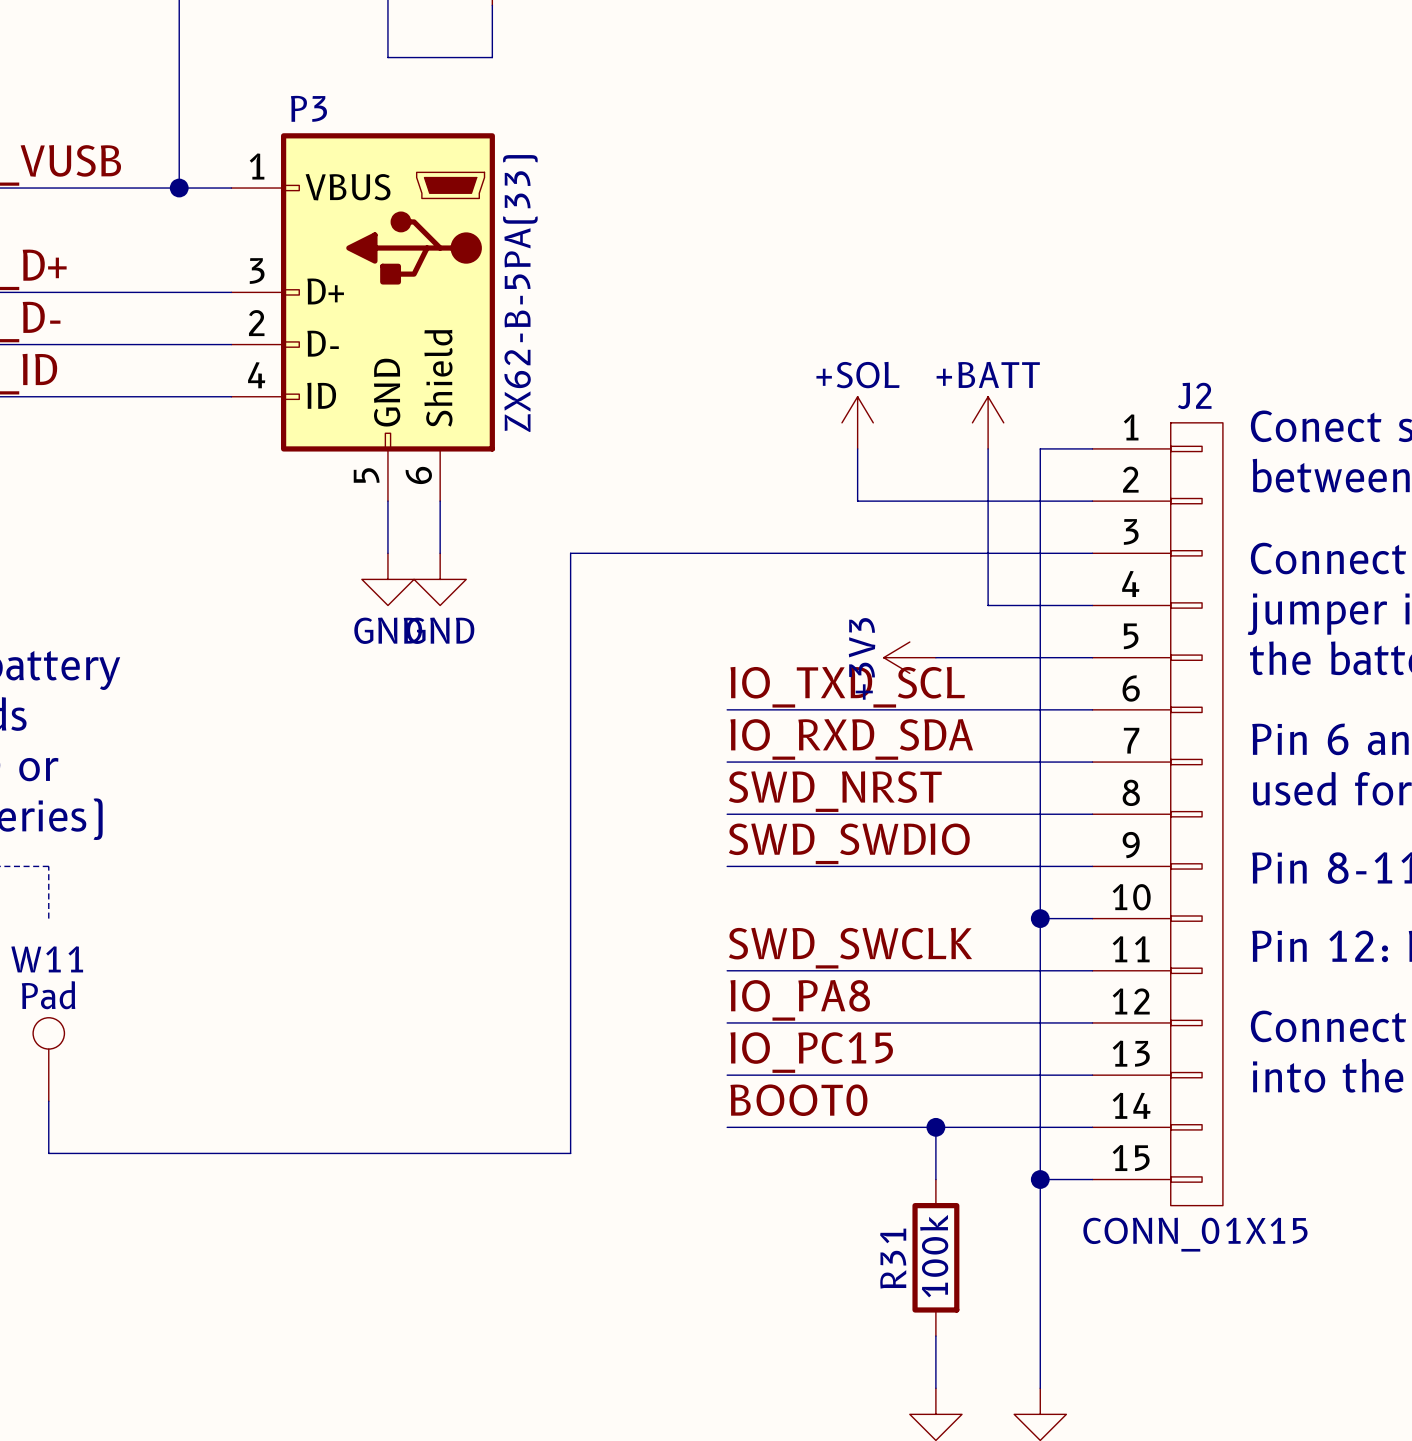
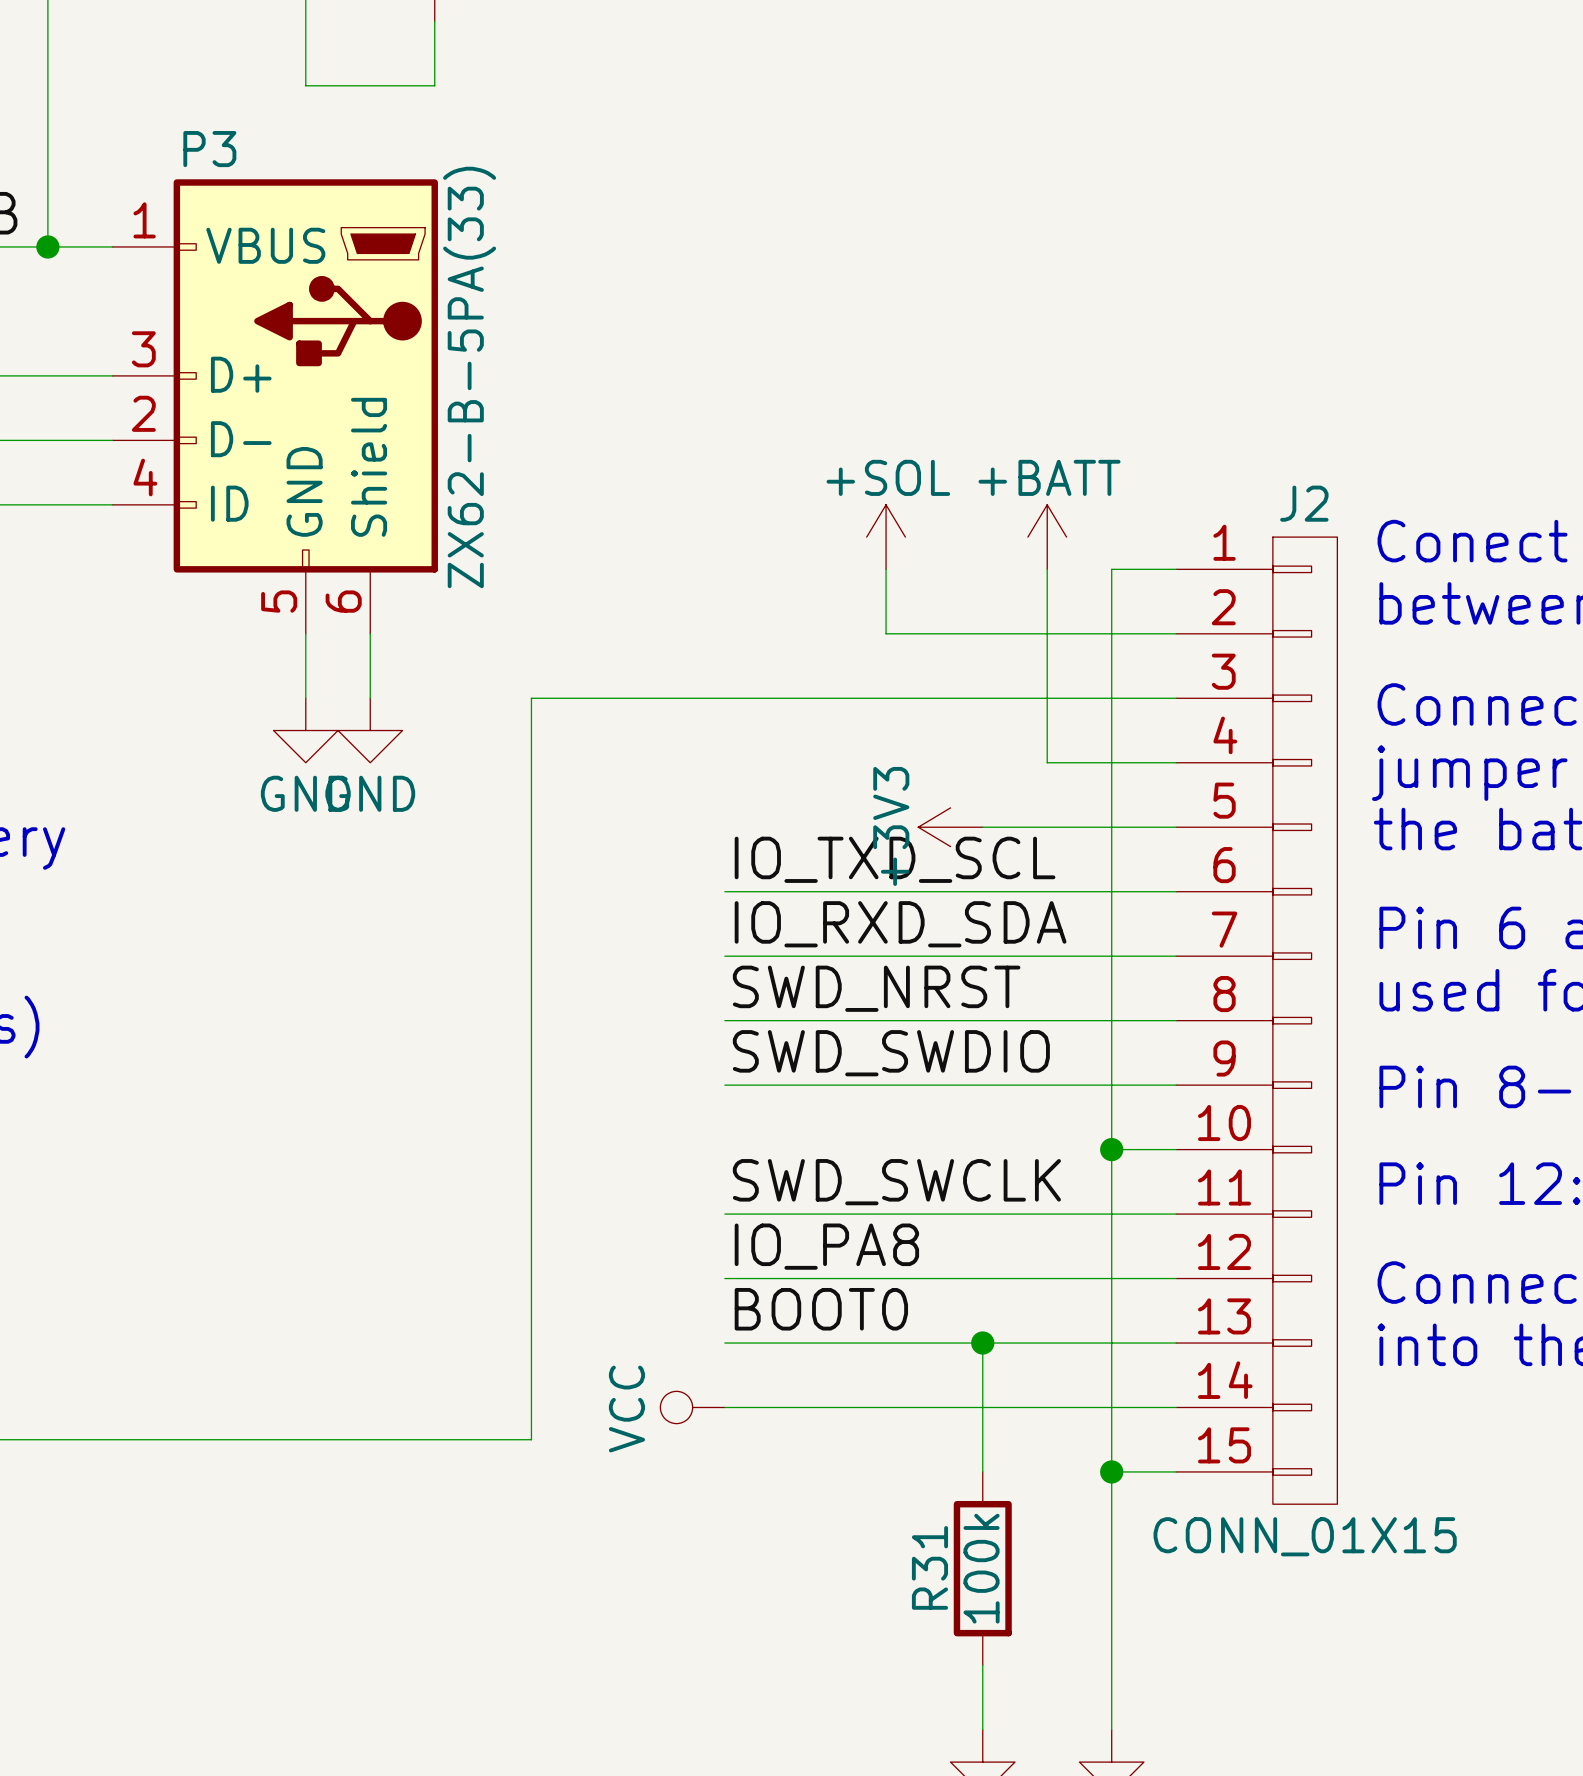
label: IO_PC15 (811, 1052) -> BOOT0 (821, 1309)
wire: none -> (982, 1343) (982, 1407)
label: BOOT0 (798, 1100) -> none
power symbol: none -> VCC (692, 1407)
junction position: (935, 1127) -> (982, 1343)

